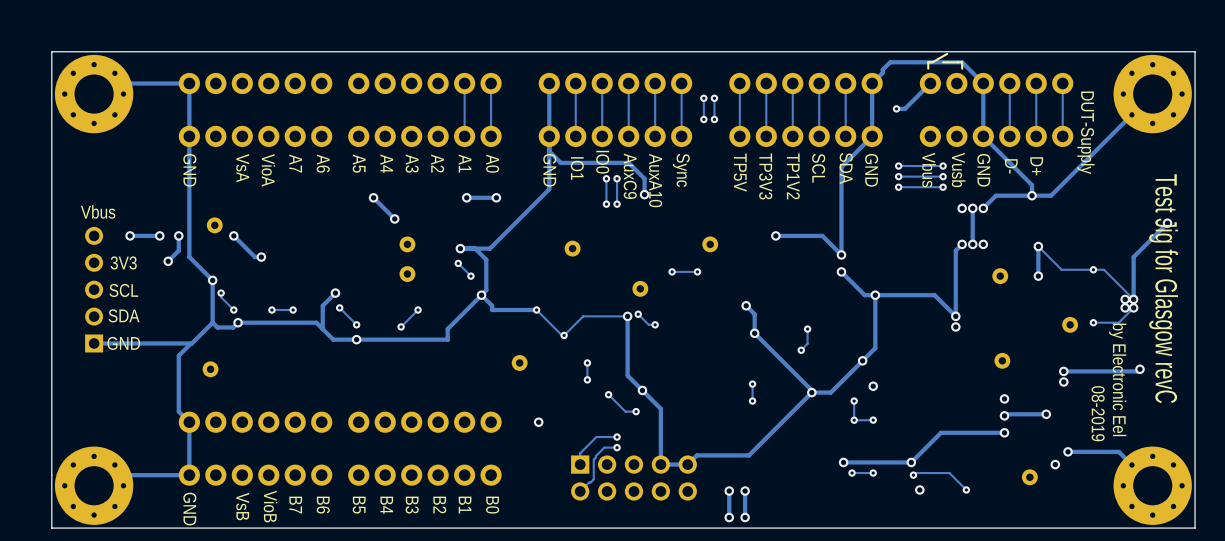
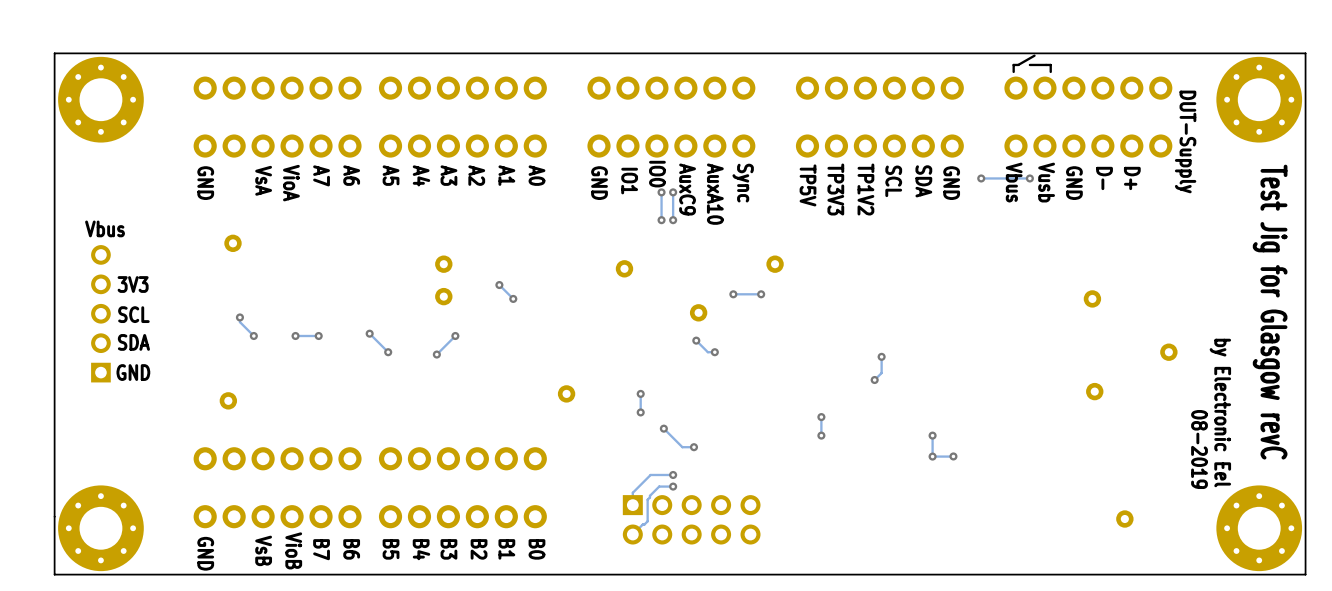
track: (1152, 64) (1152, 94) (1051, 195) (996, 195) (983, 208) -> none
track: (104, 83) (189, 83) (189, 257) (212, 280) (212, 322) -> none
track: (464, 83) (464, 136) -> none
track: (491, 83) (491, 136) -> none
track: (549, 83) (549, 189) (490, 248) (460, 248) -> none
track: (575, 83) (575, 136) -> none
track: (602, 83) (602, 136) -> none
track: (628, 83) (628, 136) -> none
track: (655, 83) (655, 136) -> none
track: (681, 83) (681, 136) -> none
track: (739, 83) (739, 136) -> none
track: (766, 83) (766, 136) -> none
track: (792, 83) (792, 136) -> none
track: (819, 83) (819, 136) -> none
track: (845, 83) (845, 136) -> none
track: (930, 83) (904, 108) (896, 108) -> none
track: (1009, 83) (1009, 136) -> none
track: (1036, 83) (1036, 136) -> none
track: (1062, 83) (1062, 136) -> none
track: (703, 98) (703, 119) -> none
via: (703, 98) -> none
track: (714, 98) (714, 119) -> none
via: (714, 98) -> none
via: (896, 108) -> none
via: (703, 119) -> none
via: (714, 119) -> none
track: (549, 151) (560, 162) (628, 162) (644, 178) (644, 194) -> none
via: (898, 176) -> none
track: (943, 176) (898, 176) -> none
via: (943, 176) -> none
via: (898, 187) -> none
track: (943, 187) (898, 187) -> none
via: (943, 187) -> none
via: (644, 194) -> none
track: (1032, 195) (1032, 185) (983, 136) (983, 83) (962, 62) (890, 62) (872, 83) (872, 136) (841, 167) (841, 254) (822, 235) (775, 235) -> none
via: (1032, 195) -> none
track: (373, 197) (394, 218) -> none
via: (373, 197) -> none
via: (466, 197) -> none
track: (496, 197) (466, 197) -> none
via: (496, 197) -> none
via: (962, 208) -> none
track: (972, 208) (972, 244) -> none
via: (972, 208) -> none
via: (983, 208) -> none
via: (394, 218) -> none
track: (1167, 223) (1133, 257) (1133, 299) (1104, 269) (1061, 269) (1038, 246) (1038, 276) -> none
via: (1167, 223) -> none
via: (130, 235) -> none
track: (159, 235) (130, 235) -> none
via: (159, 235) -> none
track: (178, 235) (178, 250) (168, 261) -> none
via: (178, 235) -> none
track: (233, 235) (255, 257) (261, 257) -> none
via: (233, 235) -> none
via: (775, 235) -> none
track: (962, 244) (955, 250) (955, 316) (934, 295) (864, 295) (841, 271) -> none
via: (962, 244) -> none
via: (972, 244) -> none
via: (983, 244) -> none
via: (1038, 246) -> none
via: (460, 248) -> none
track: (475, 248) (486, 259) (486, 290) (447, 329) (447, 339) (333, 339) (316, 322) (238, 322) (233, 327) (217, 327) (212, 322) -> none
via: (841, 254) -> none
via: (261, 257) -> none
via: (168, 261) -> none
via: (1093, 269) -> none
via: (841, 271) -> none
via: (1038, 276) -> none
via: (212, 280) -> none
track: (335, 293) (322, 305) (322, 329) -> none
via: (335, 293) -> none
track: (481, 295) (492, 305) (492, 310) (536, 310) (562, 335) (583, 316) (627, 316) (627, 375) (660, 408) (660, 464) (687, 464) (696, 455) (748, 455) (811, 392) -> none
via: (481, 295) -> none
track: (875, 295) (875, 348) (830, 392) (811, 392) -> none
via: (875, 295) -> none
via: (1125, 299) -> none
via: (1133, 299) -> none
track: (746, 305) (754, 314) (754, 333) (811, 392) -> none
via: (746, 305) -> none
via: (1125, 307) -> none
track: (1133, 307) (1118, 322) (1093, 322) -> none
via: (1133, 307) -> none
via: (536, 310) -> none
via: (627, 316) -> none
via: (955, 316) -> none
track: (212, 322) (191, 343) (94, 343) -> none
via: (238, 322) -> none
via: (1093, 322) -> none
via: (955, 326) -> none
via: (754, 333) -> none
via: (564, 335) -> none
via: (356, 339) -> none
track: (191, 343) (178, 355) (178, 411) (189, 422) (189, 475) (104, 475) -> none
via: (862, 360) -> none
track: (1140, 369) (1137, 371) (1063, 371) -> none
via: (1140, 369) -> none
via: (1063, 371) -> none
via: (1063, 382) -> none
via: (873, 386) -> none
via: (642, 390) -> none
via: (811, 392) -> none
via: (1004, 398) -> none
track: (1046, 414) (1006, 414) (1004, 415) -> none
via: (1046, 414) -> none
via: (1004, 415) -> none
via: (538, 422) -> none
track: (1004, 432) (940, 432) (911, 462) (843, 462) -> none
via: (1004, 432) -> none
track: (1068, 451) (1118, 451) (1157, 490) -> none
via: (1068, 451) -> none
via: (843, 462) -> none
via: (911, 462) -> none
via: (1055, 464) -> none
via: (852, 473) -> none
track: (873, 473) (852, 473) -> none
via: (873, 473) -> none
track: (913, 475) (915, 473) (949, 473) (966, 489) -> none
via: (913, 475) -> none
via: (919, 489) -> none
via: (966, 489) -> none
track: (729, 491) (729, 517) -> none
via: (729, 491) -> none
track: (745, 491) (745, 517) -> none
via: (745, 491) -> none
via: (729, 517) -> none
via: (745, 517) -> none

